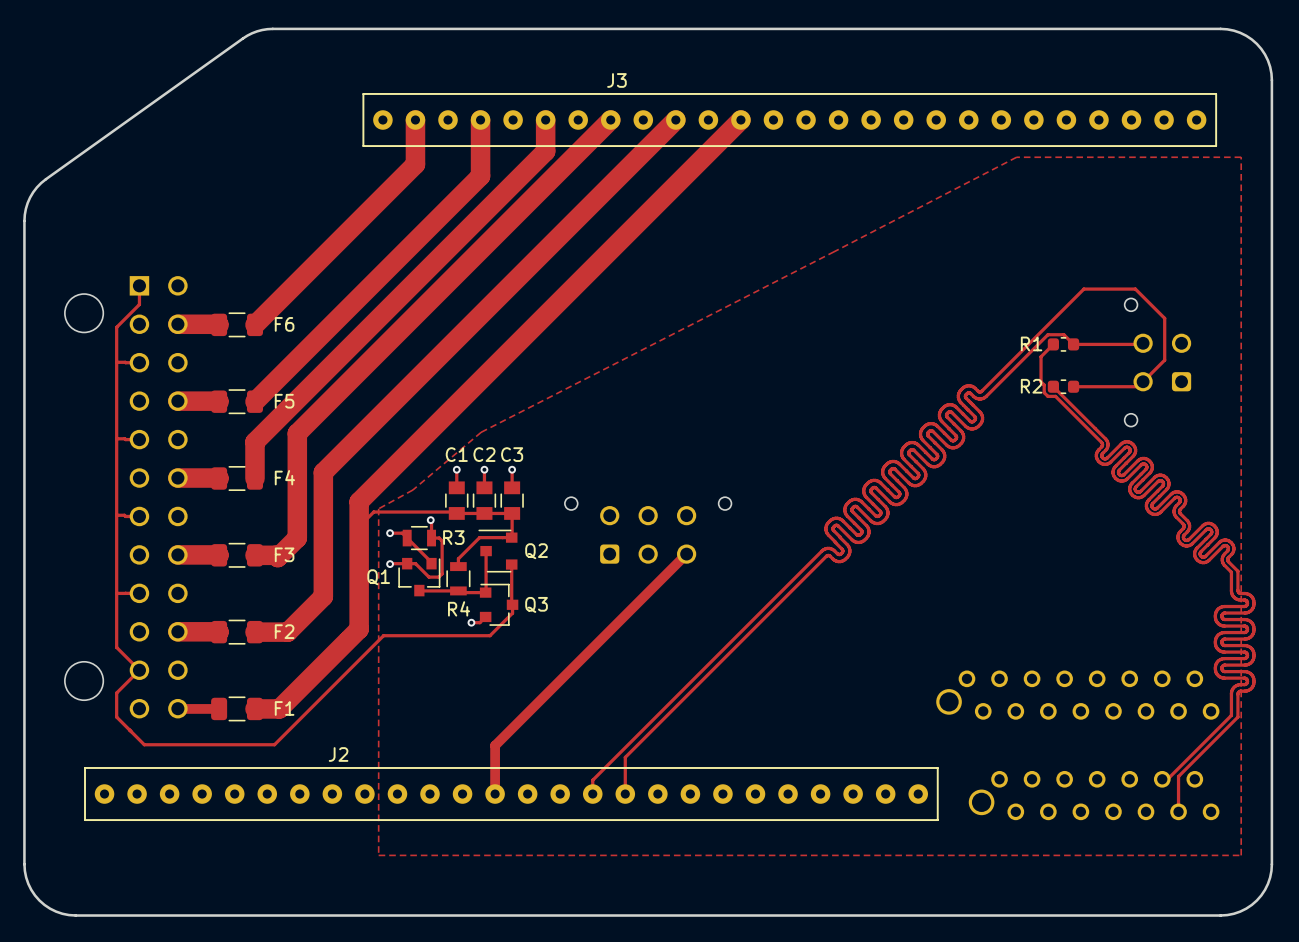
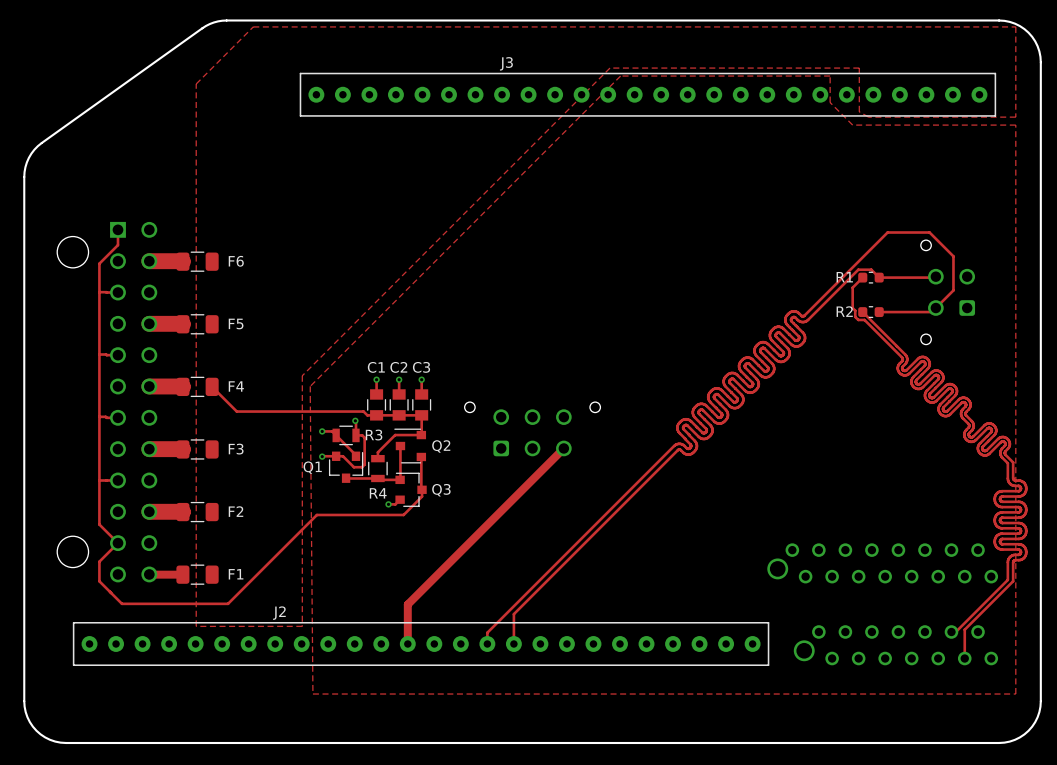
zone outline: none -> (253, 26) (196, 83) (196, 626) (302, 626) (302, 375) (609, 68) (859, 68) (859, 111) (868, 117) (1015, 117) (1015, 26) (253, 26)
track: (415, 120) (415, 164) (254, 324) -> none
track: (480, 120) (480, 176) (254, 401) -> none
track: (545, 120) (545, 151) (254, 442) (254, 478) -> none
track: (610, 120) (297, 433) (297, 538) (277, 557) (275, 555) (254, 555) -> none
track: (675, 120) (323, 472) (323, 596) (287, 632) (254, 632) -> none
track: (740, 120) (359, 501) (359, 629) (349, 638) -> none
zone outline: (1041, 157) (1016, 157) (481, 432) (412, 490) (378, 508) (378, 855) -> (852, 125) (830, 102) (830, 76) (620, 76) (310, 386) (312, 694)
track: (455, 513) (373, 512) (355, 529) (355, 632) (279, 708) (254, 708) -> (375, 415) (367, 415) (363, 411) (236, 411) (212, 386)

